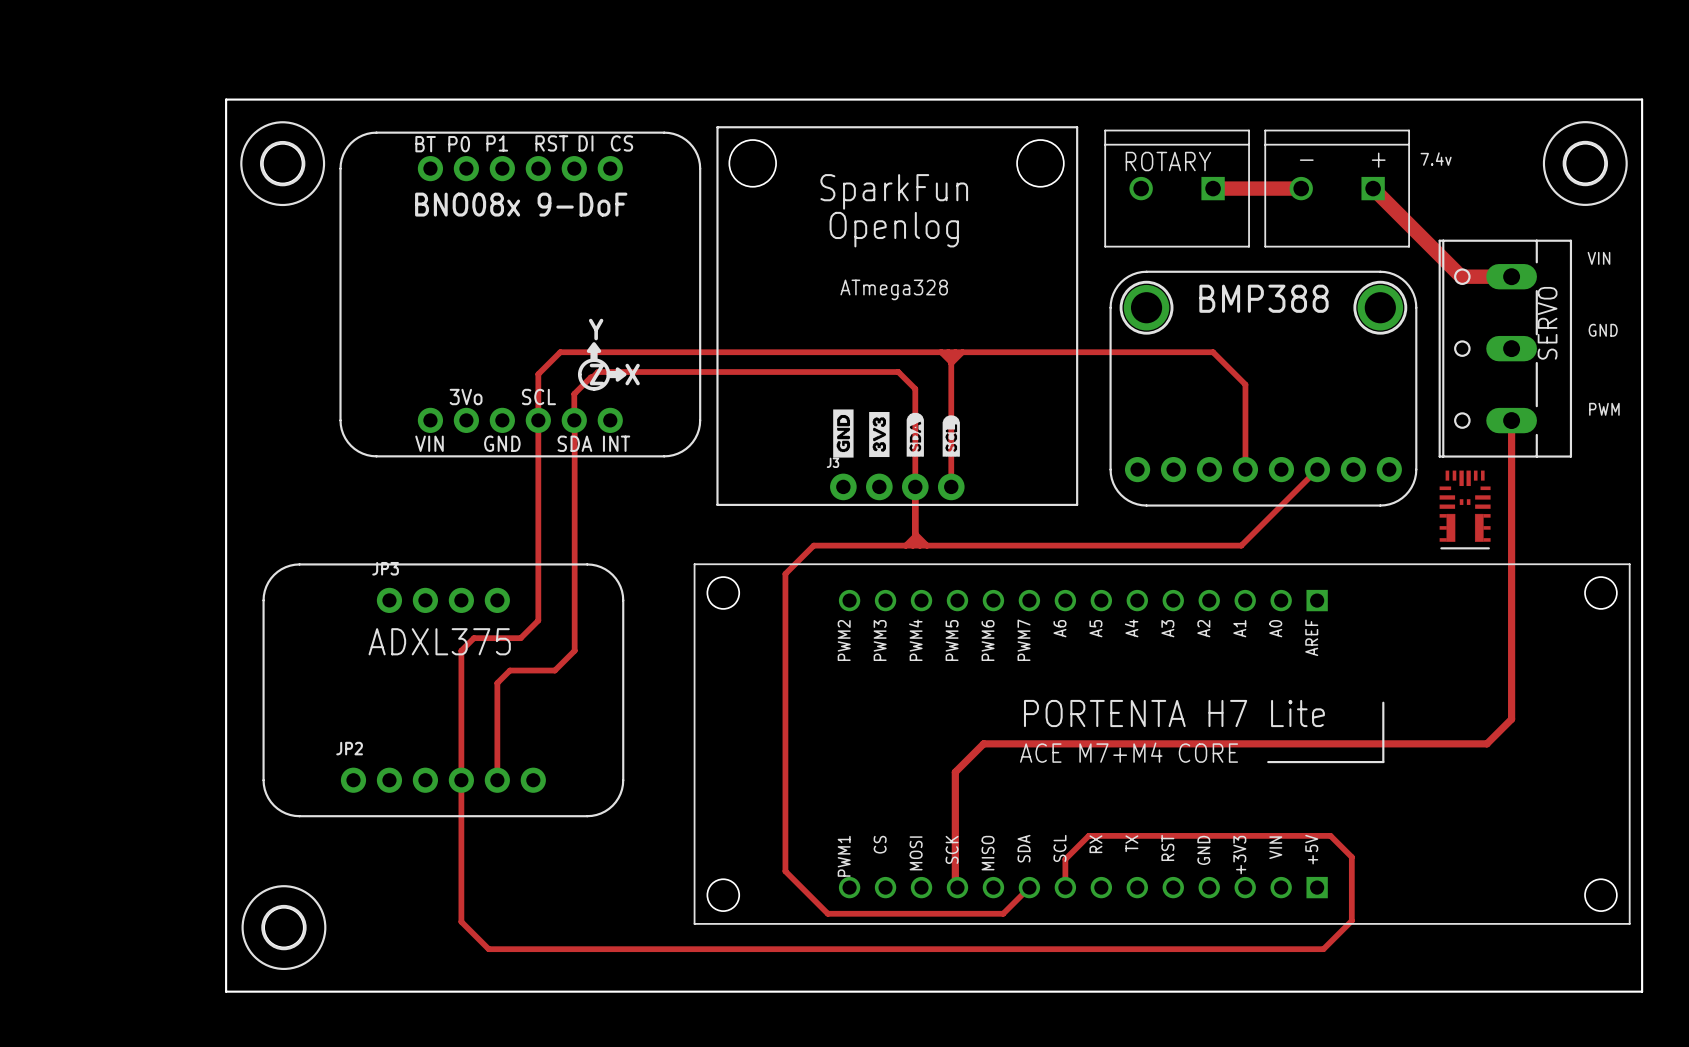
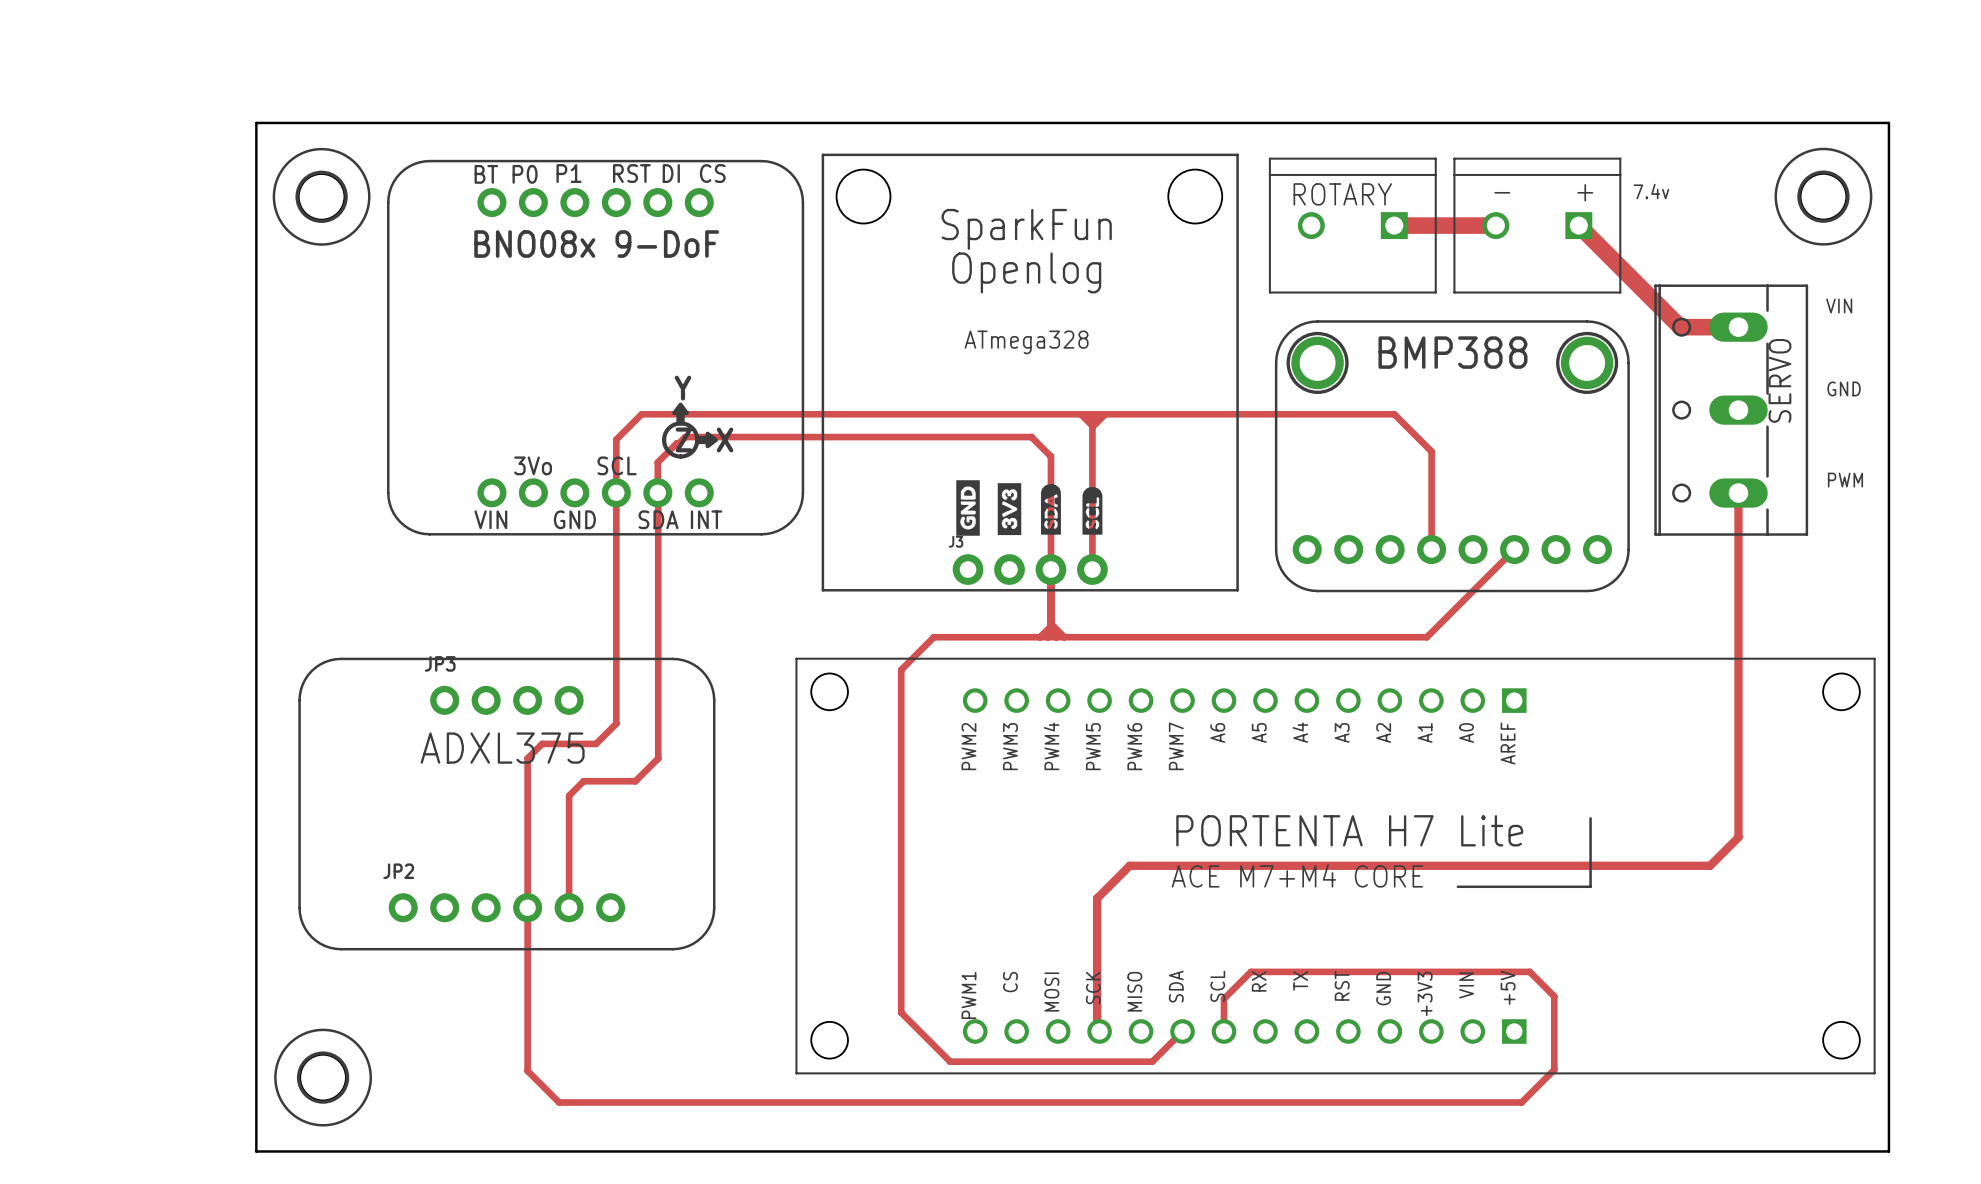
part: (1465, 509) -> none

